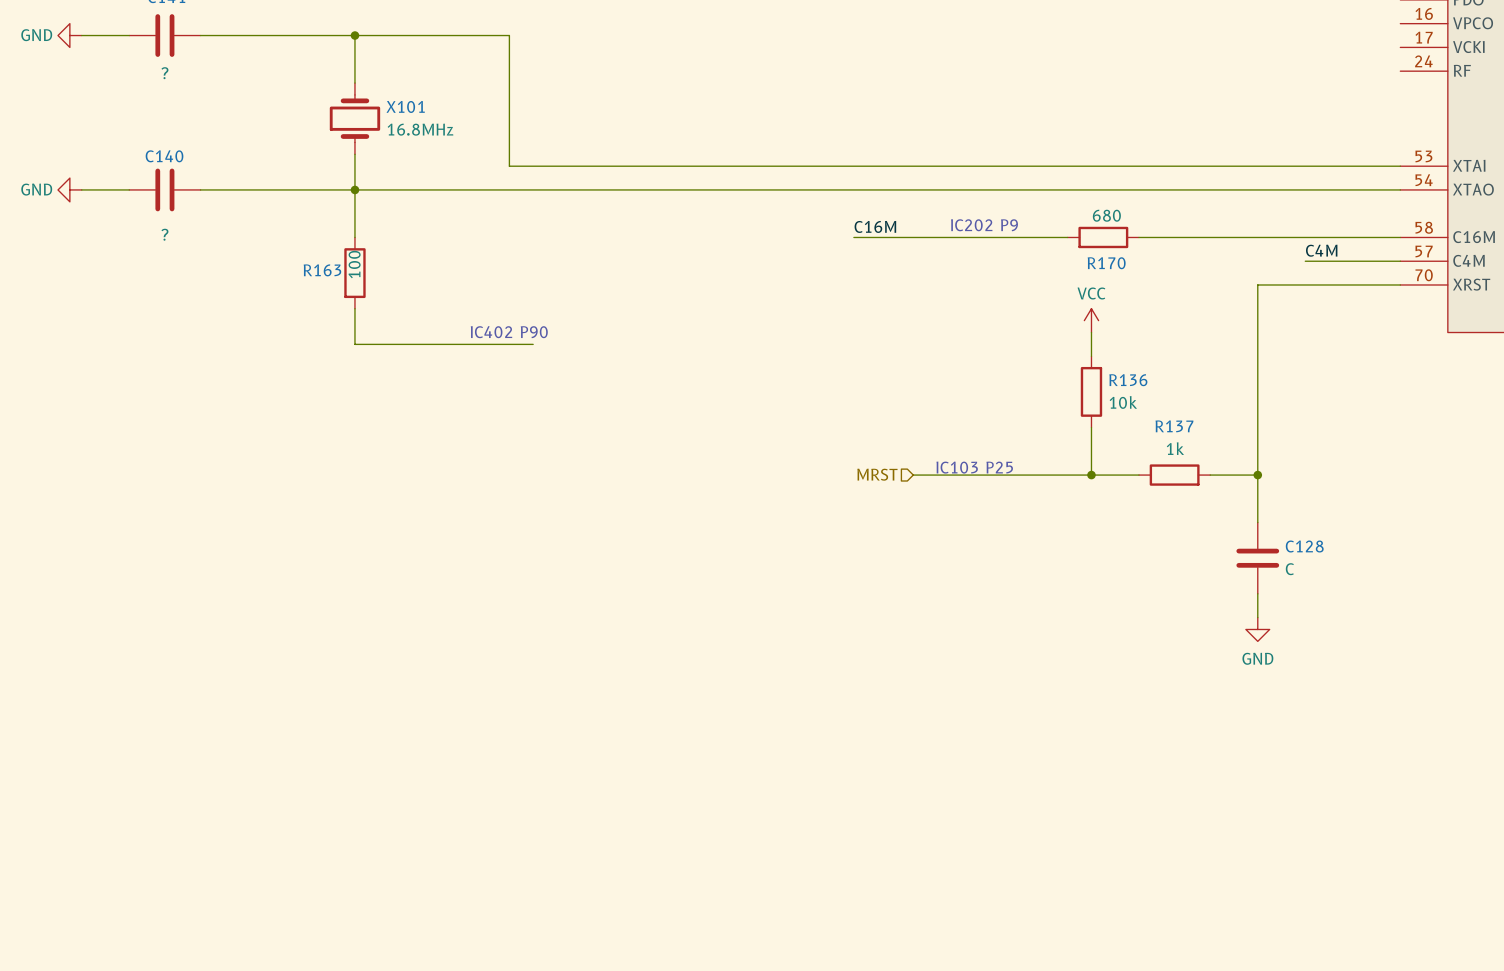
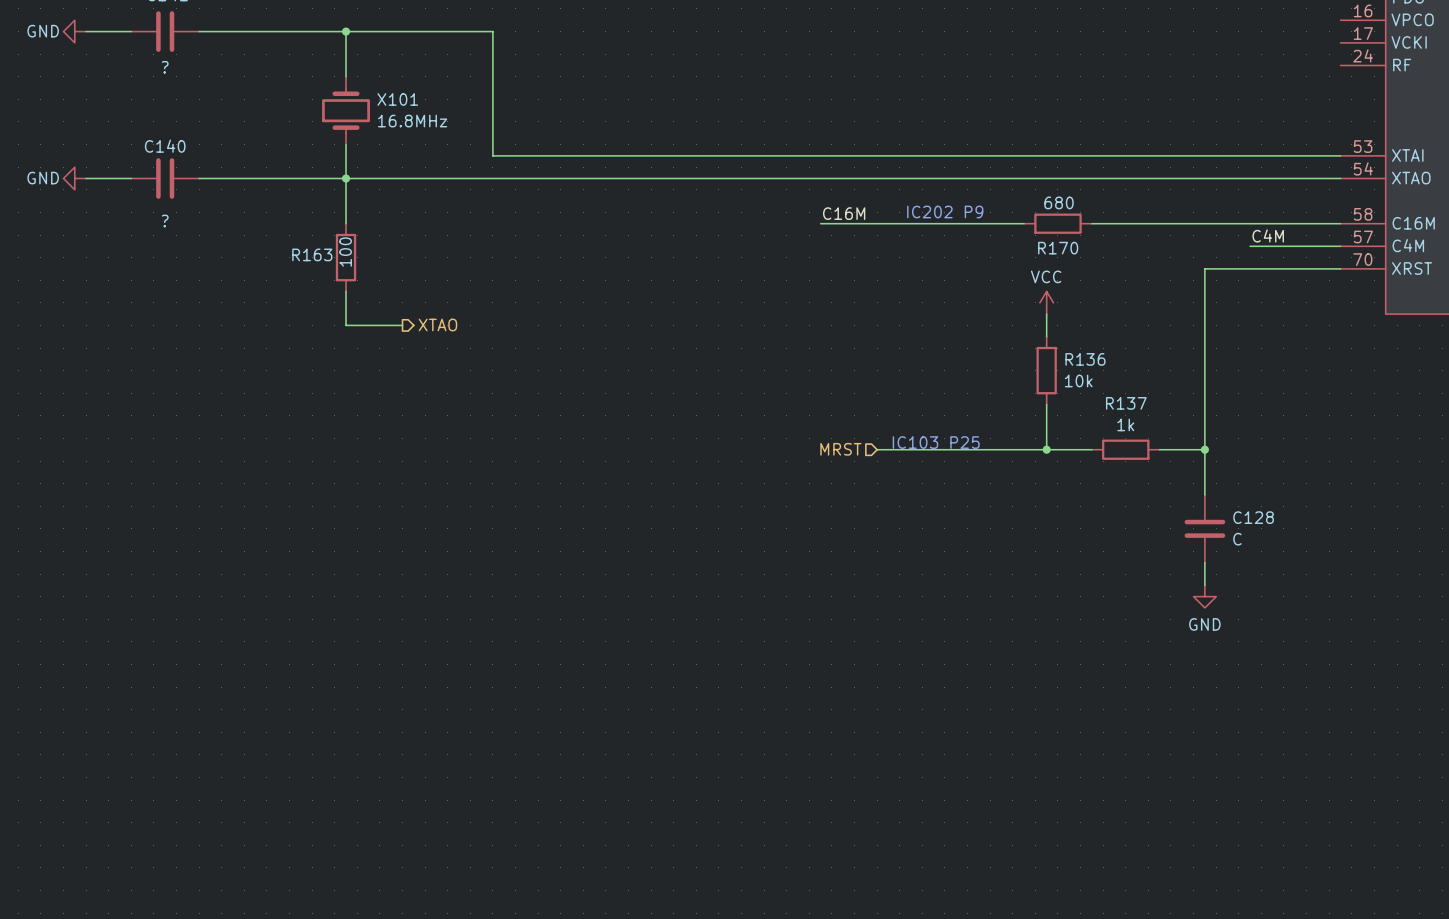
text: IC402 P90 (509, 332) -> none
wire: (414, 344) (533, 344) -> none
hierarchical label: none -> XTAO (437, 324)

